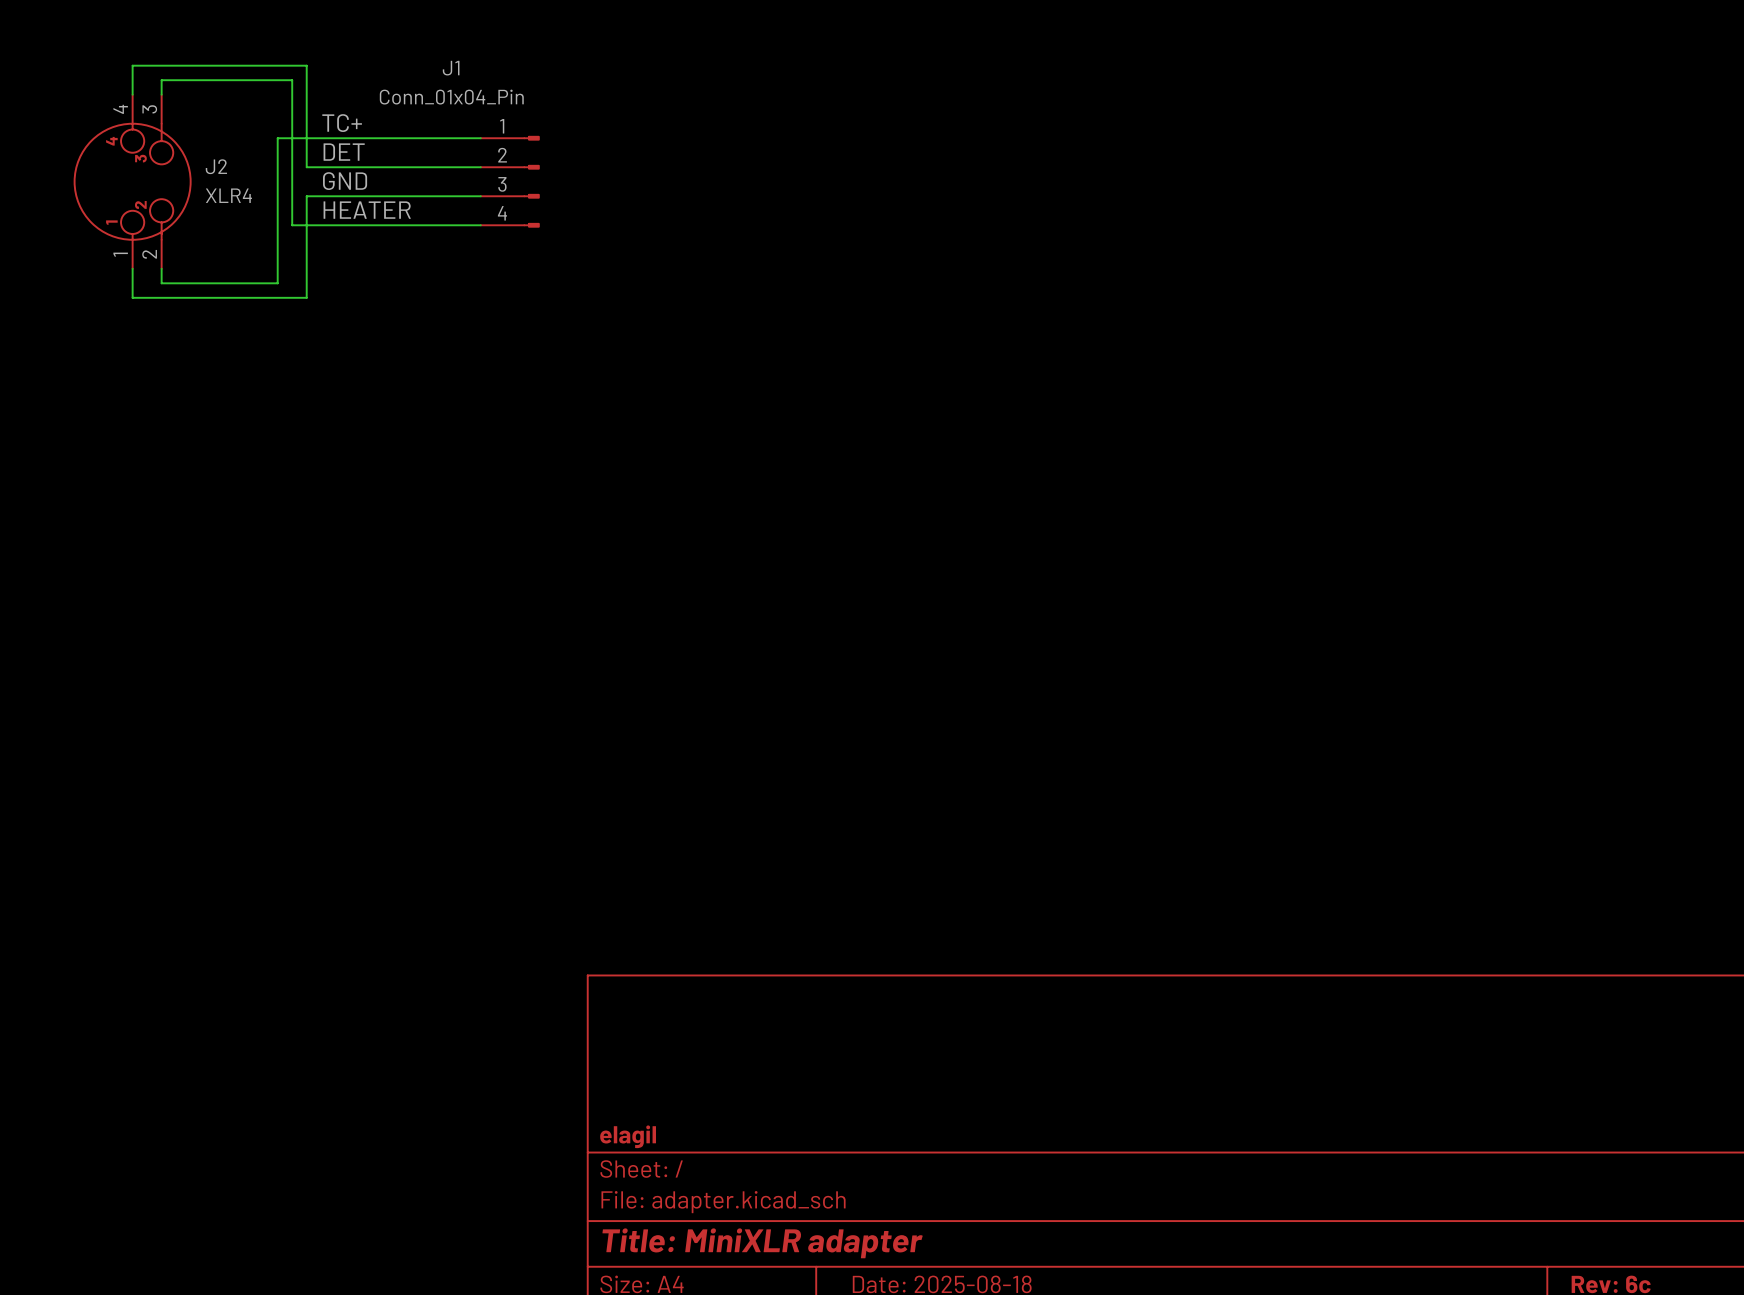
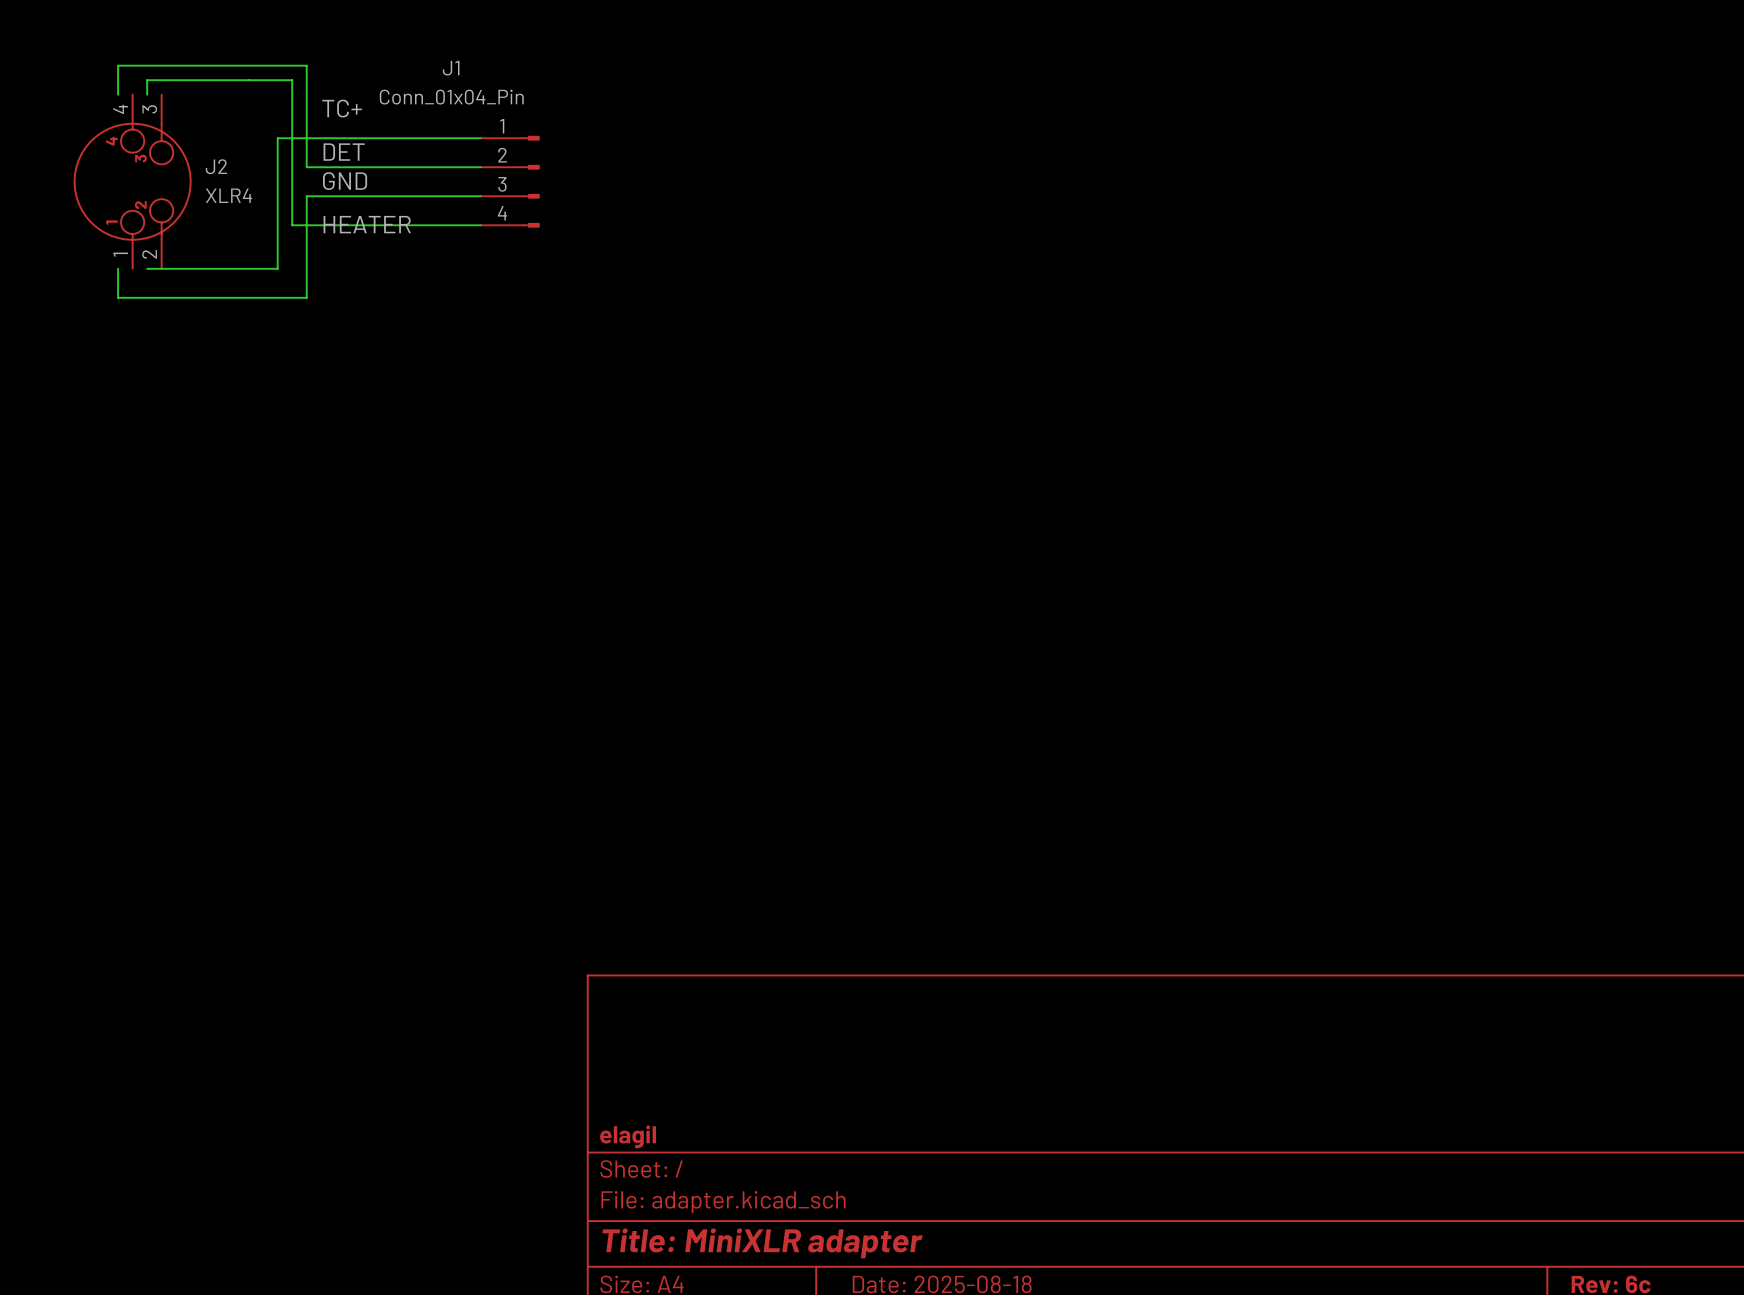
wire: (132, 65) (132, 94) -> (132, 65) (118, 65) (118, 94)
wire: (161, 80) (161, 94) -> (161, 80) (147, 80) (147, 94)
label position: TC+ (342, 123) -> TC+ (342, 108)
label position: HEATER (367, 210) -> HEATER (367, 224)
wire: (132, 268) (132, 297) -> (118, 268) (118, 297) (132, 297)
wire: (161, 268) (161, 283) (277, 283) (277, 268) -> (147, 268) (277, 268)

